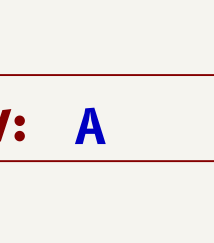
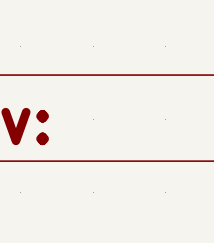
text: A (90, 125) -> none

